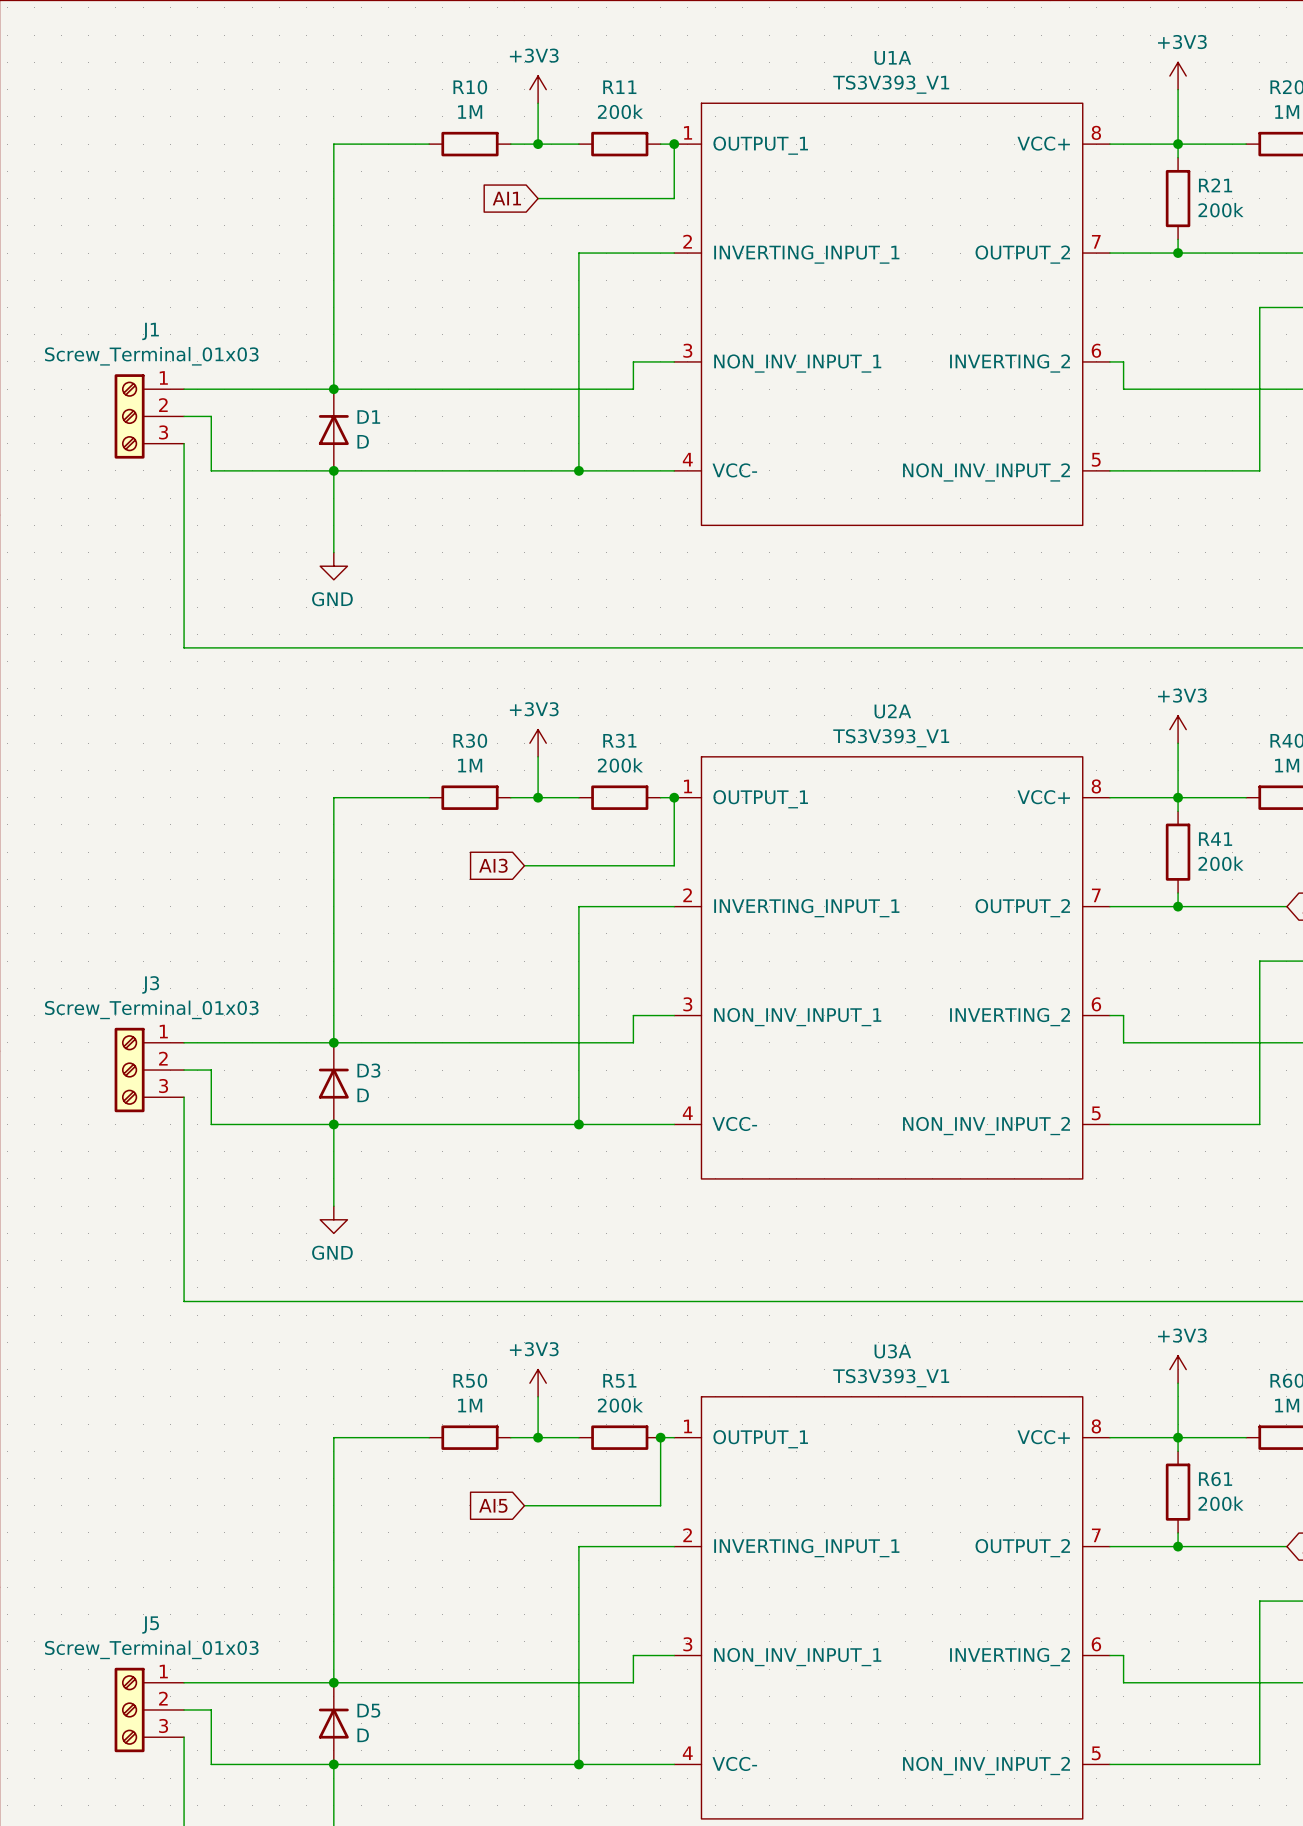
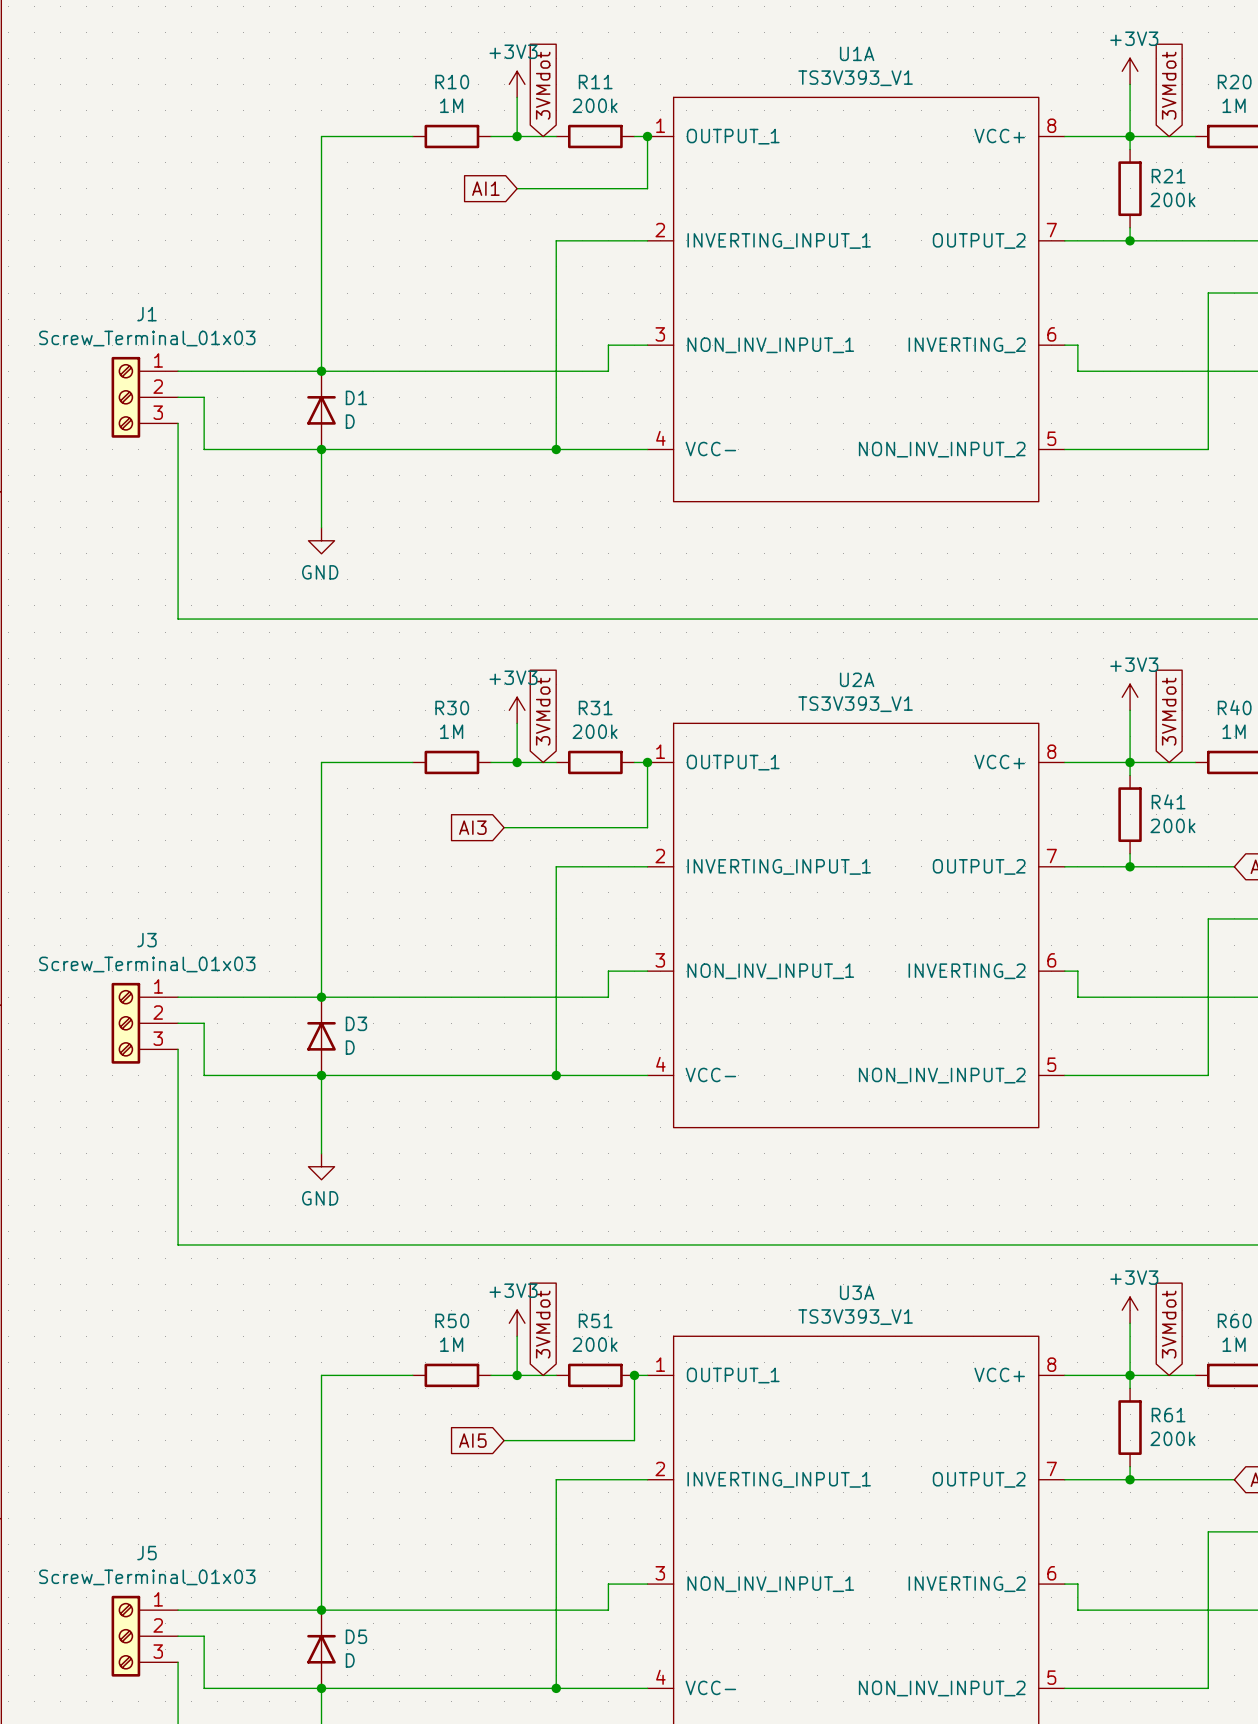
global label: none -> 3VMdot (543, 85)
global label: none -> 3VMdot (1169, 85)
global label: none -> 3VMdot (543, 711)
global label: none -> 3VMdot (1169, 711)
global label: none -> 3VMdot (543, 1324)
global label: none -> 3VMdot (1169, 1324)

